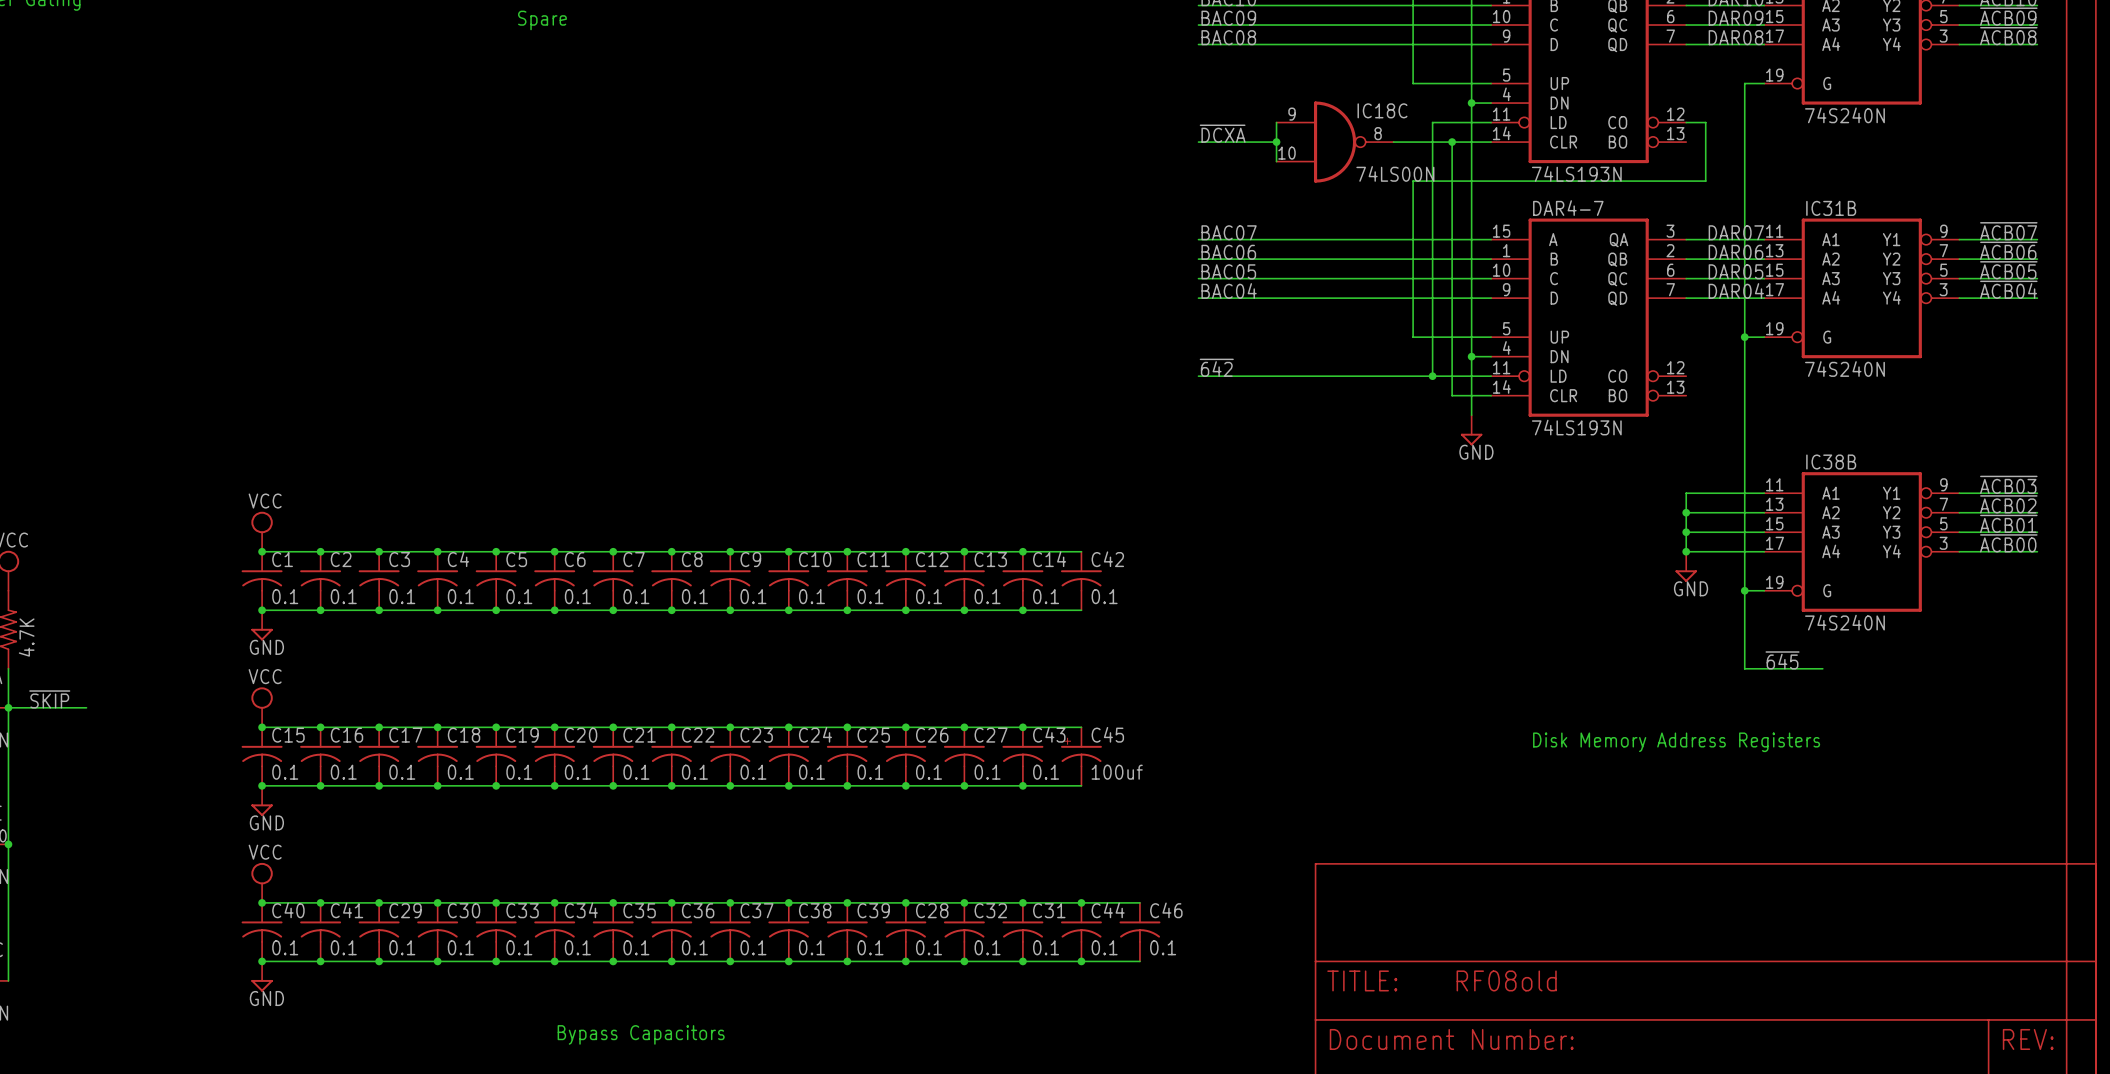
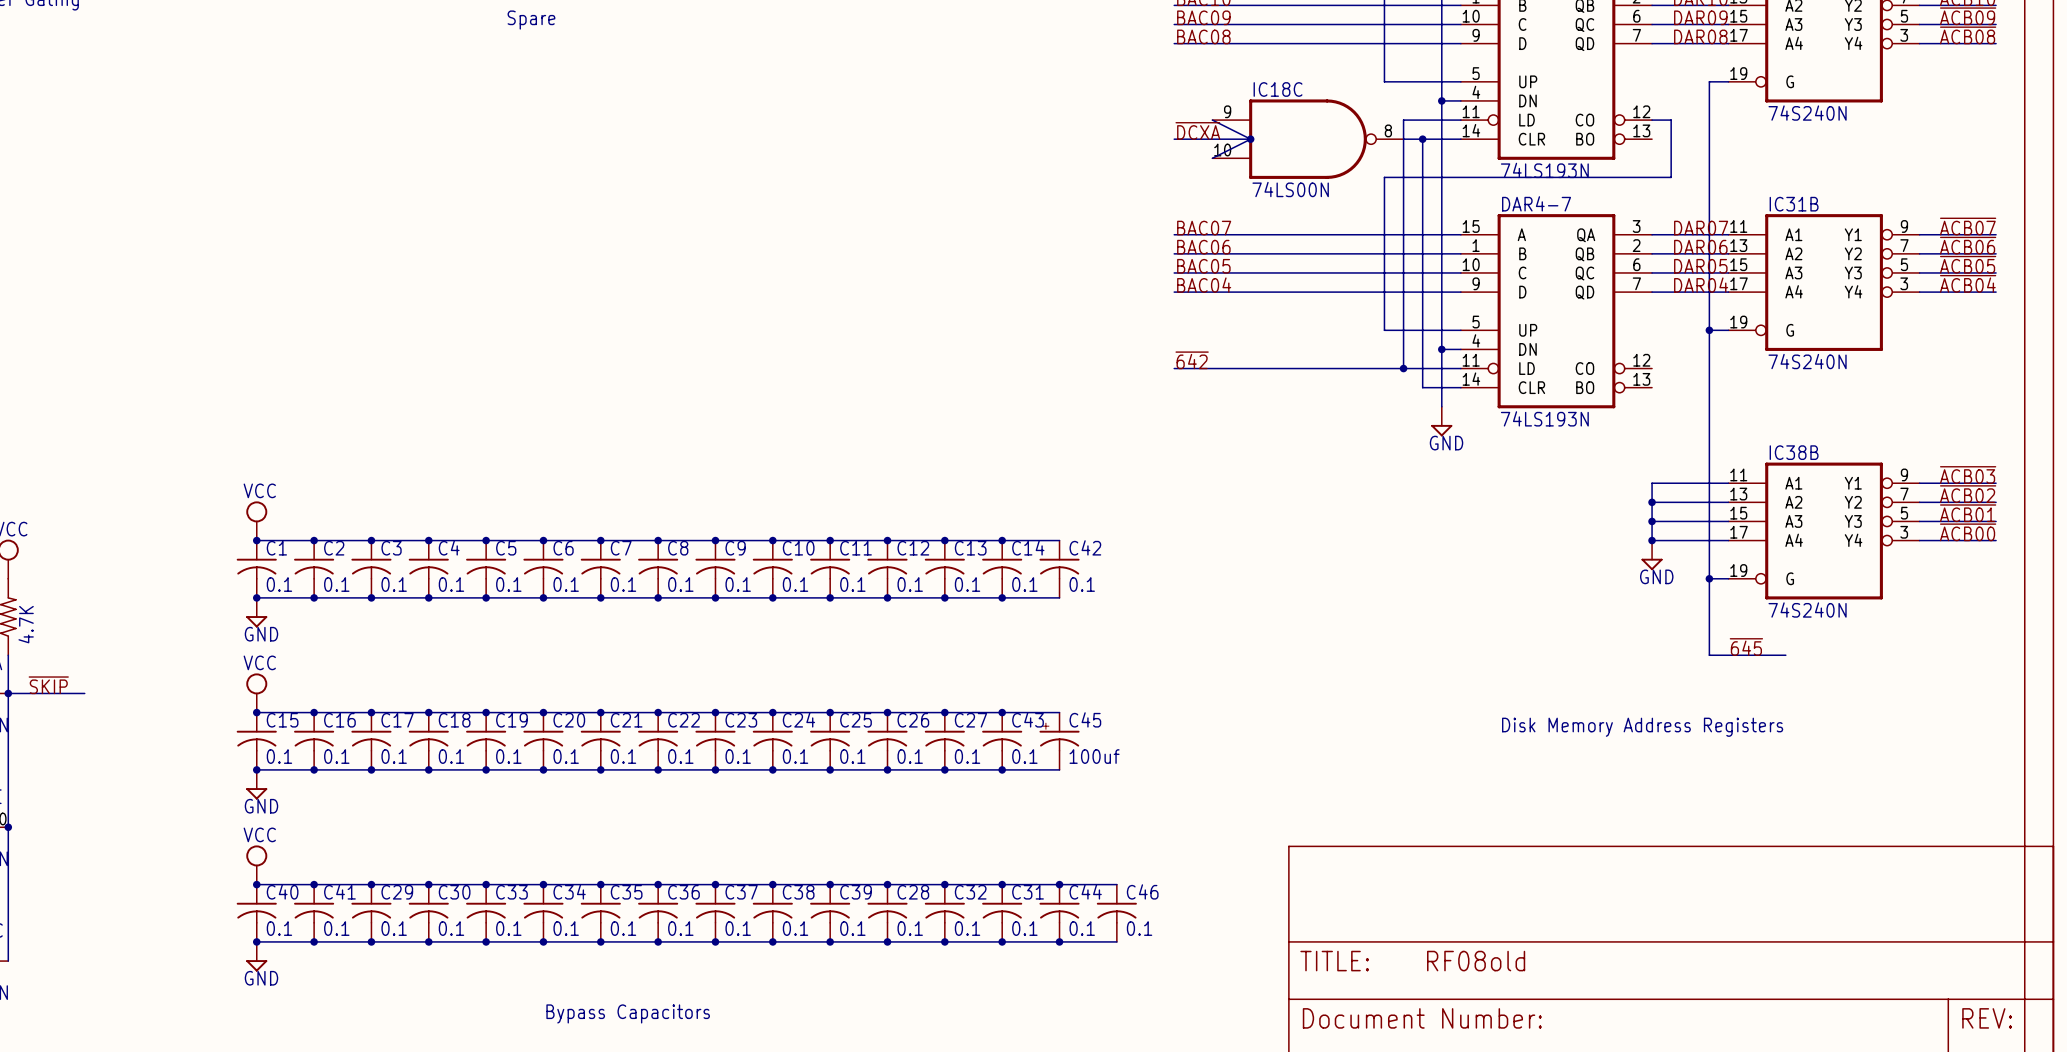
IC18C symbol: [1276, 101, 1394, 183] -> [1212, 99, 1404, 179]
IC18C name position: IC18C (1382, 110) -> IC18C (1278, 89)
wire: none -> (1212, 120) (1250, 139) (1212, 158)
IC18C value position: 74LS00N (1395, 173) -> 74LS00N (1290, 189)

